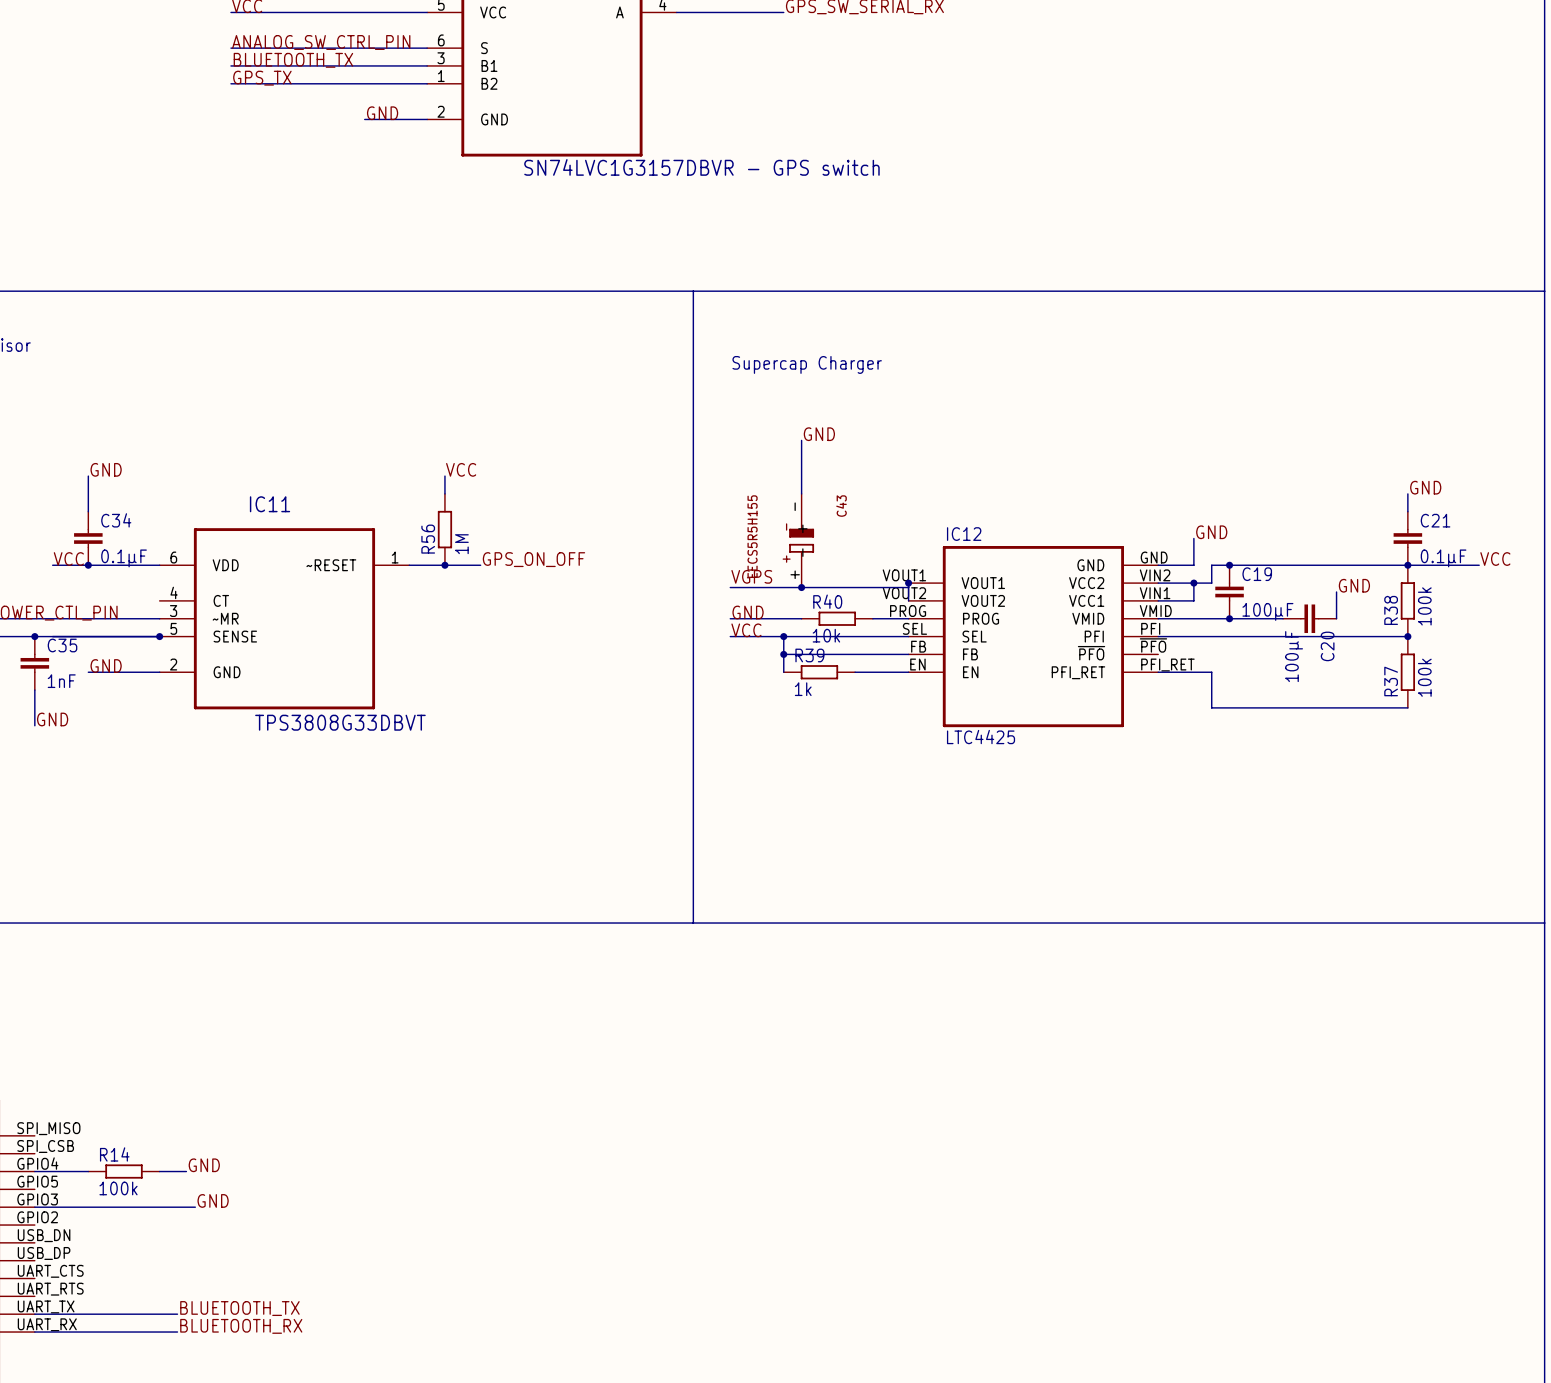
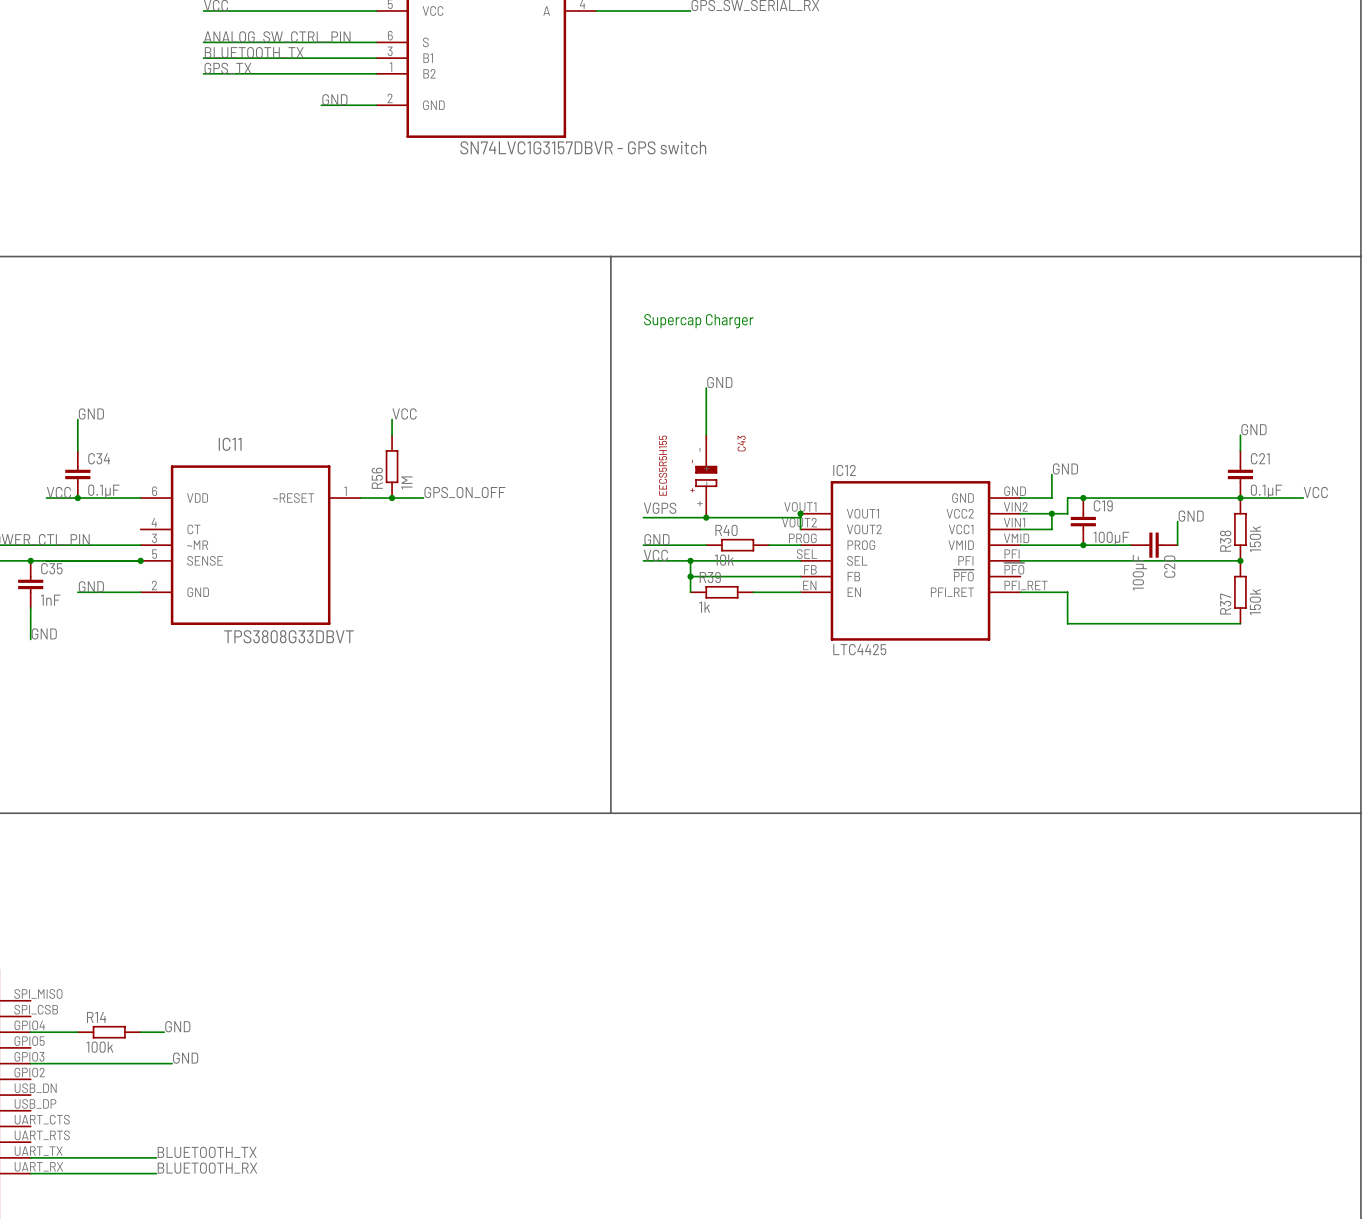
R38 value: 100k (1424, 606) -> 150k (1255, 539)
R37 value: 100k (1424, 677) -> 150k (1255, 602)

